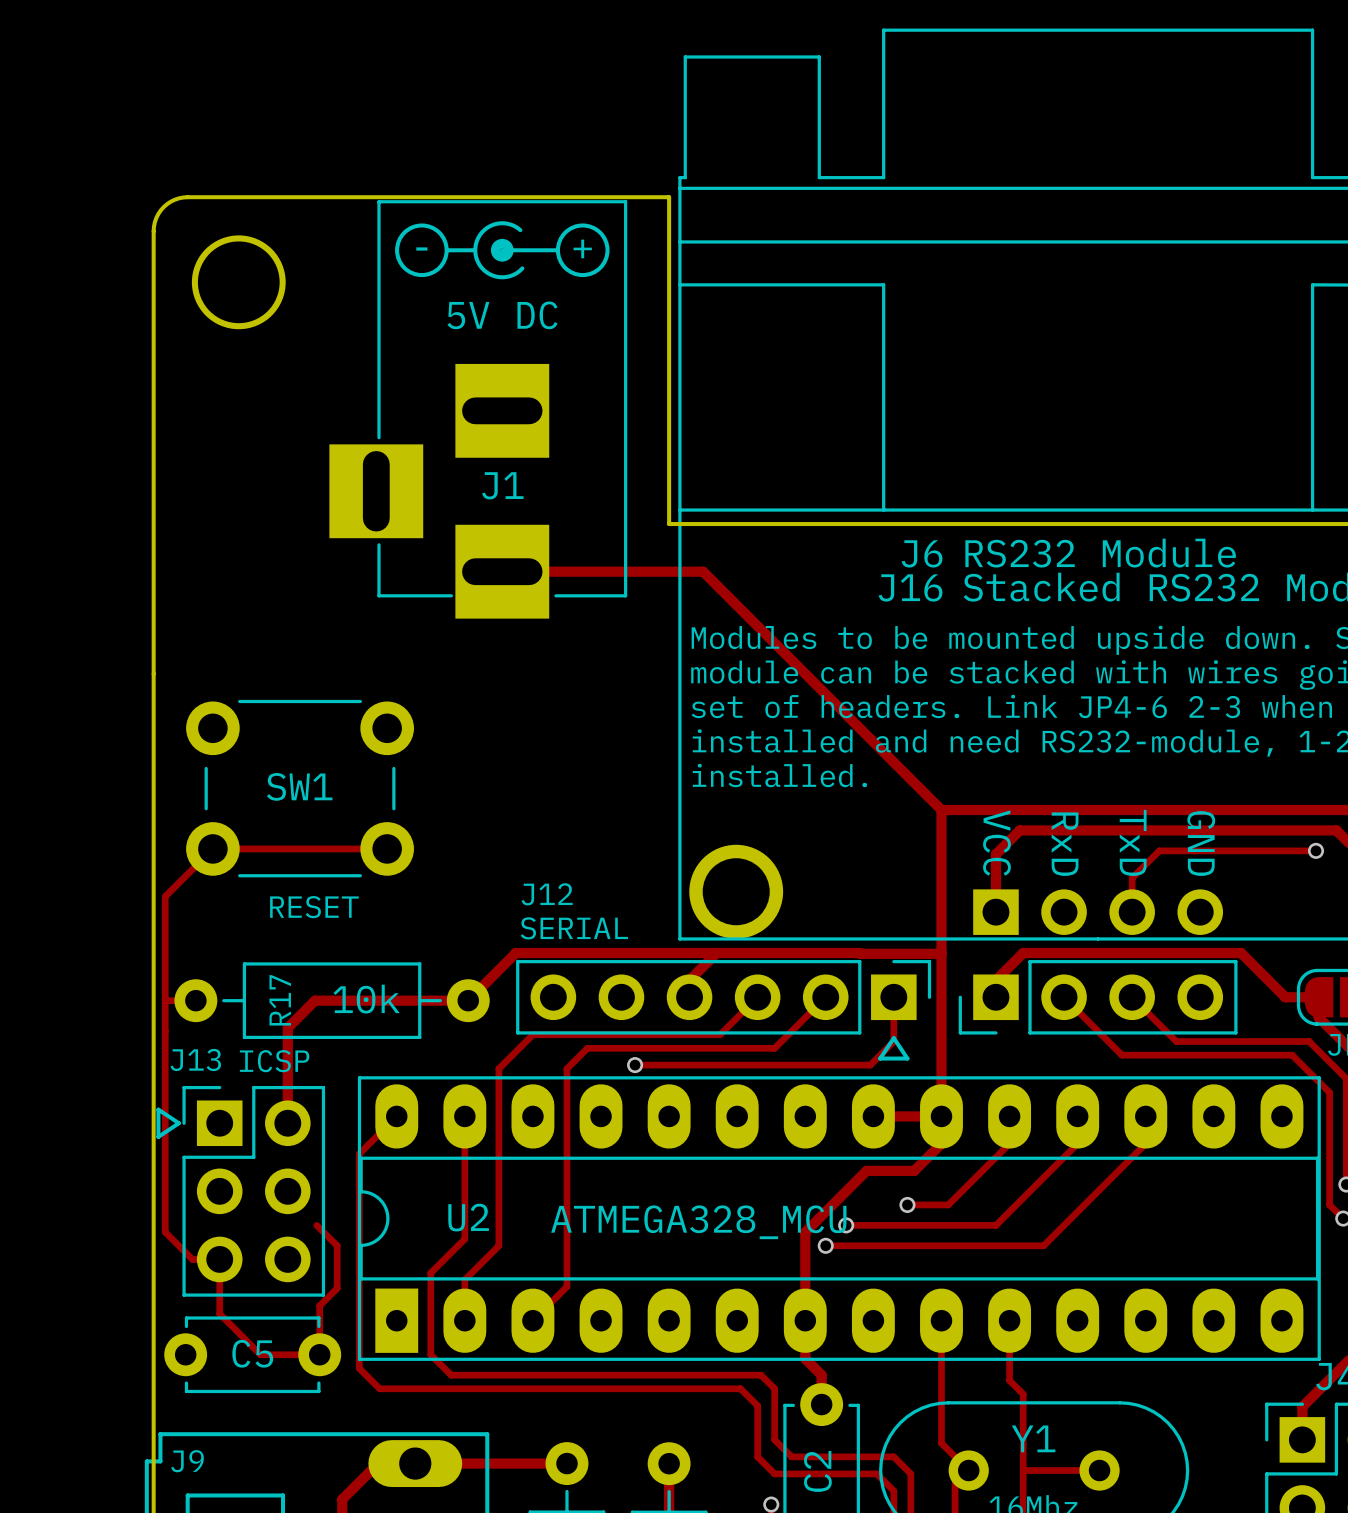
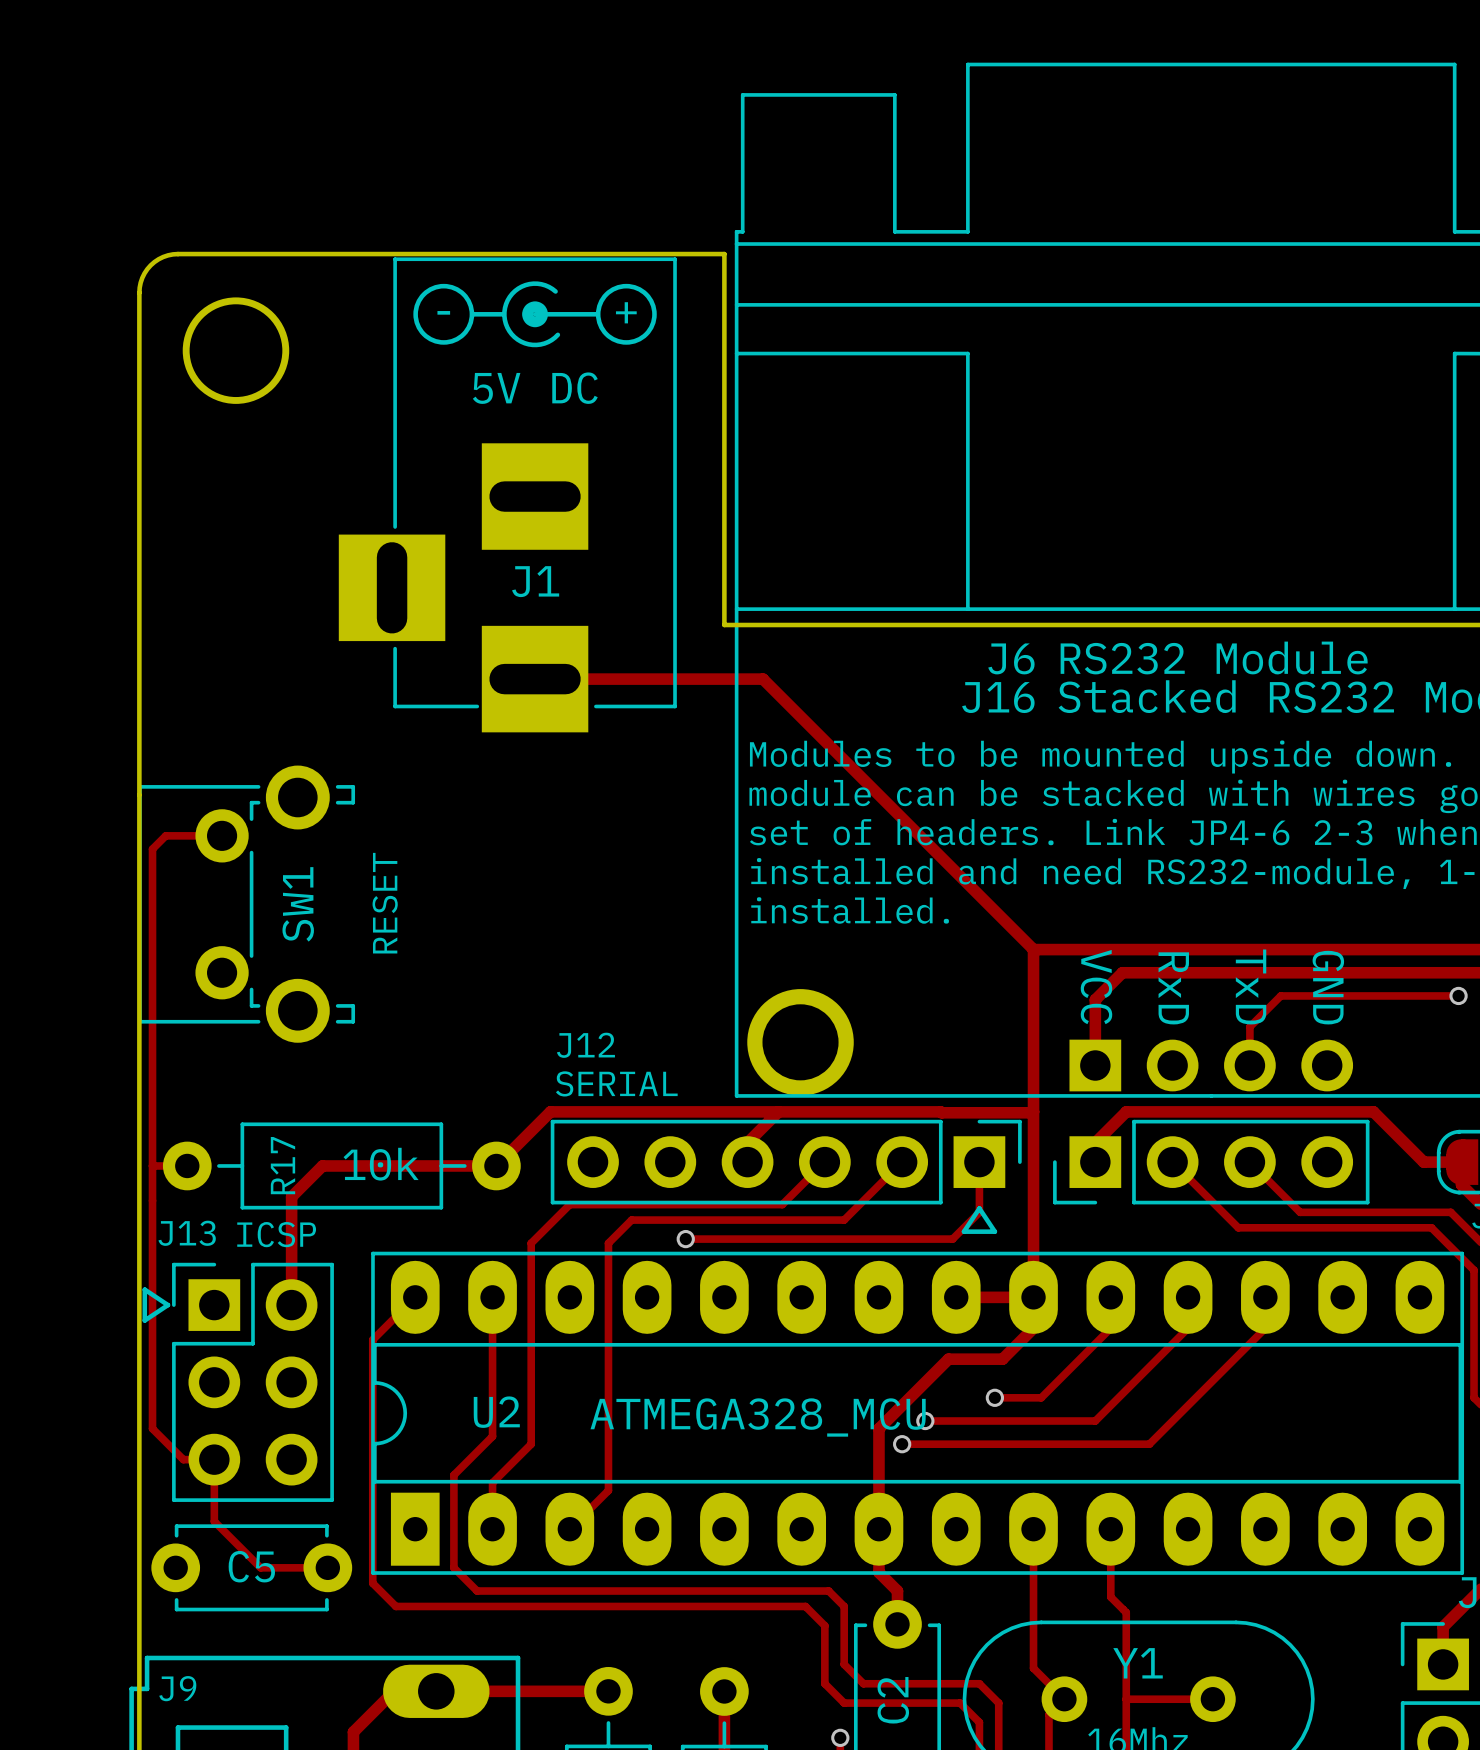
SW1 footprint: [186, 699, 414, 878] -> [138, 765, 356, 1043]
track: (387, 848) (212, 848) (165, 896) -> (222, 835) (165, 835) (152, 849) (152, 1047)
SW1 value position: RESET (314, 907) -> RESET (385, 903)
track: (316, 1225) (337, 1245) (337, 1288) (319, 1305) (319, 1354) -> none

